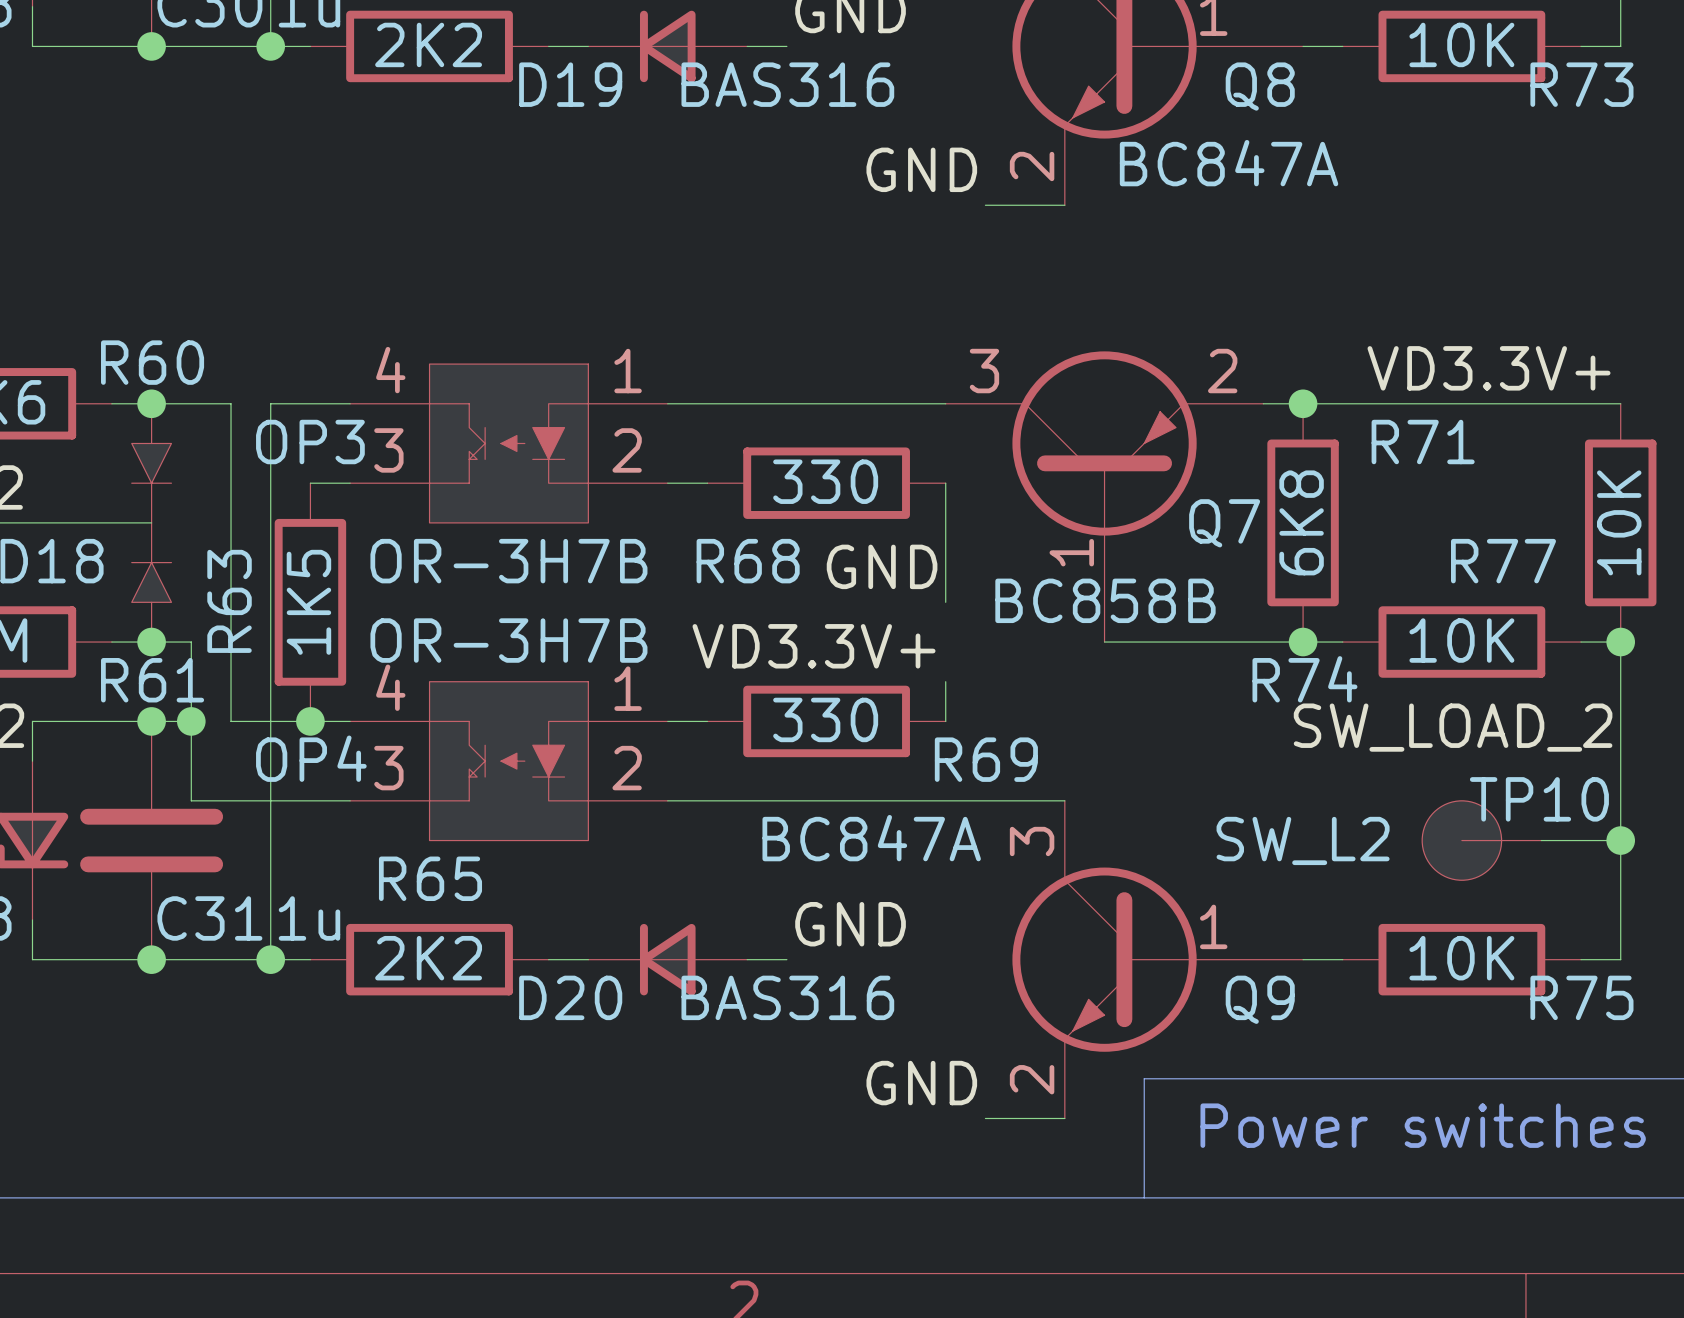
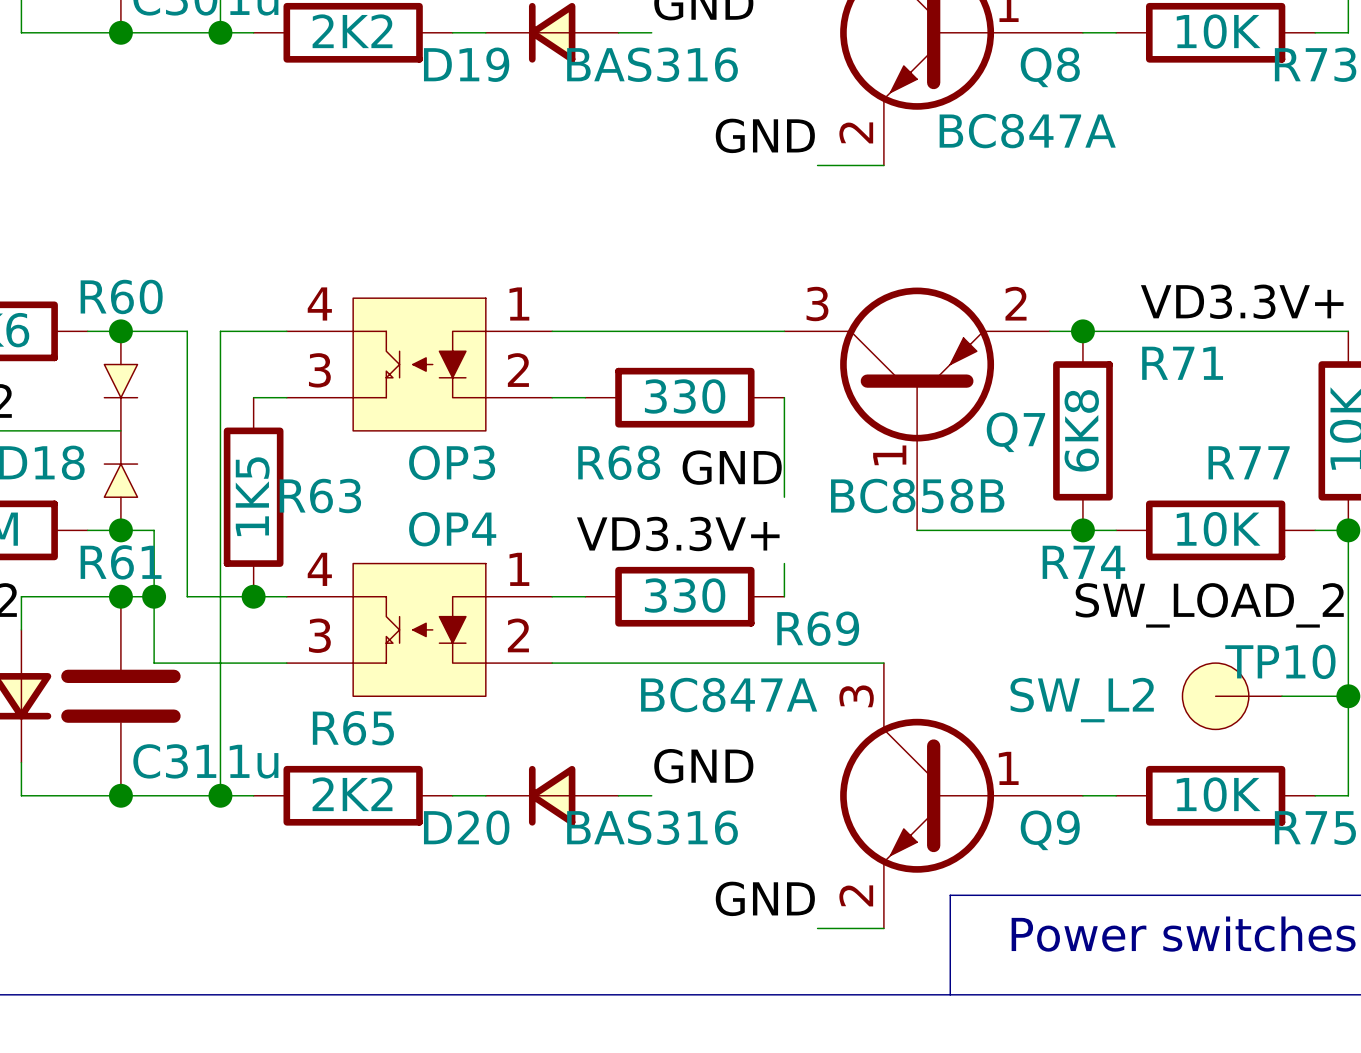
OP3 name position: OP3 (310, 442) -> OP3 (452, 462)
OP3 value: OR-3H7B (508, 561) -> none
R63 name rotation: 0° (229, 601) -> 90° clockwise (320, 496)
R63 name position: R63 (229, 601) -> R63 (320, 496)
OP4 value: OR-3H7B (508, 640) -> none
OP4 name position: OP4 (311, 758) -> OP4 (452, 529)

